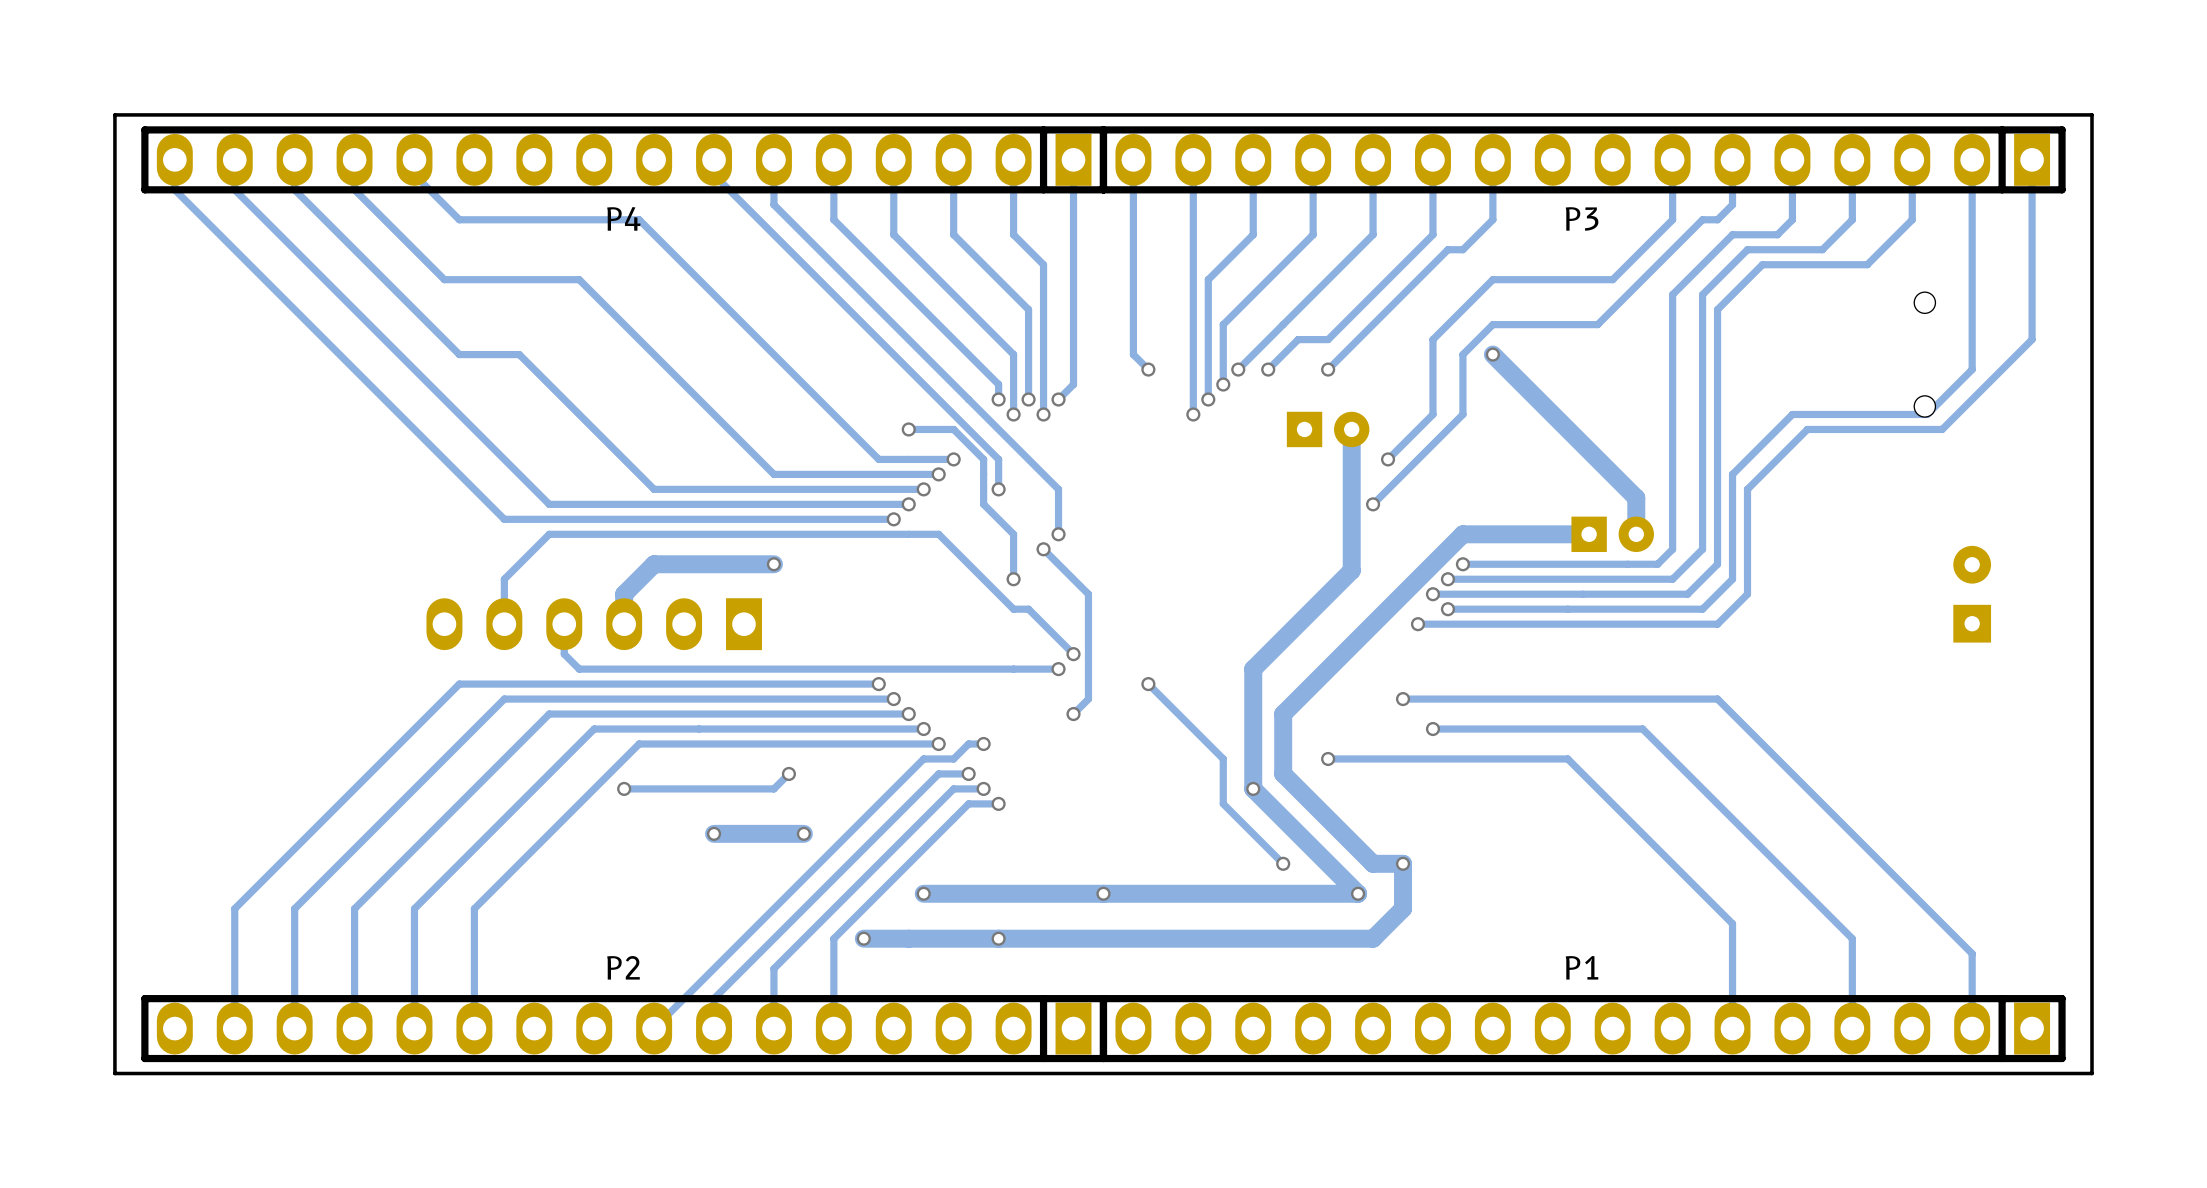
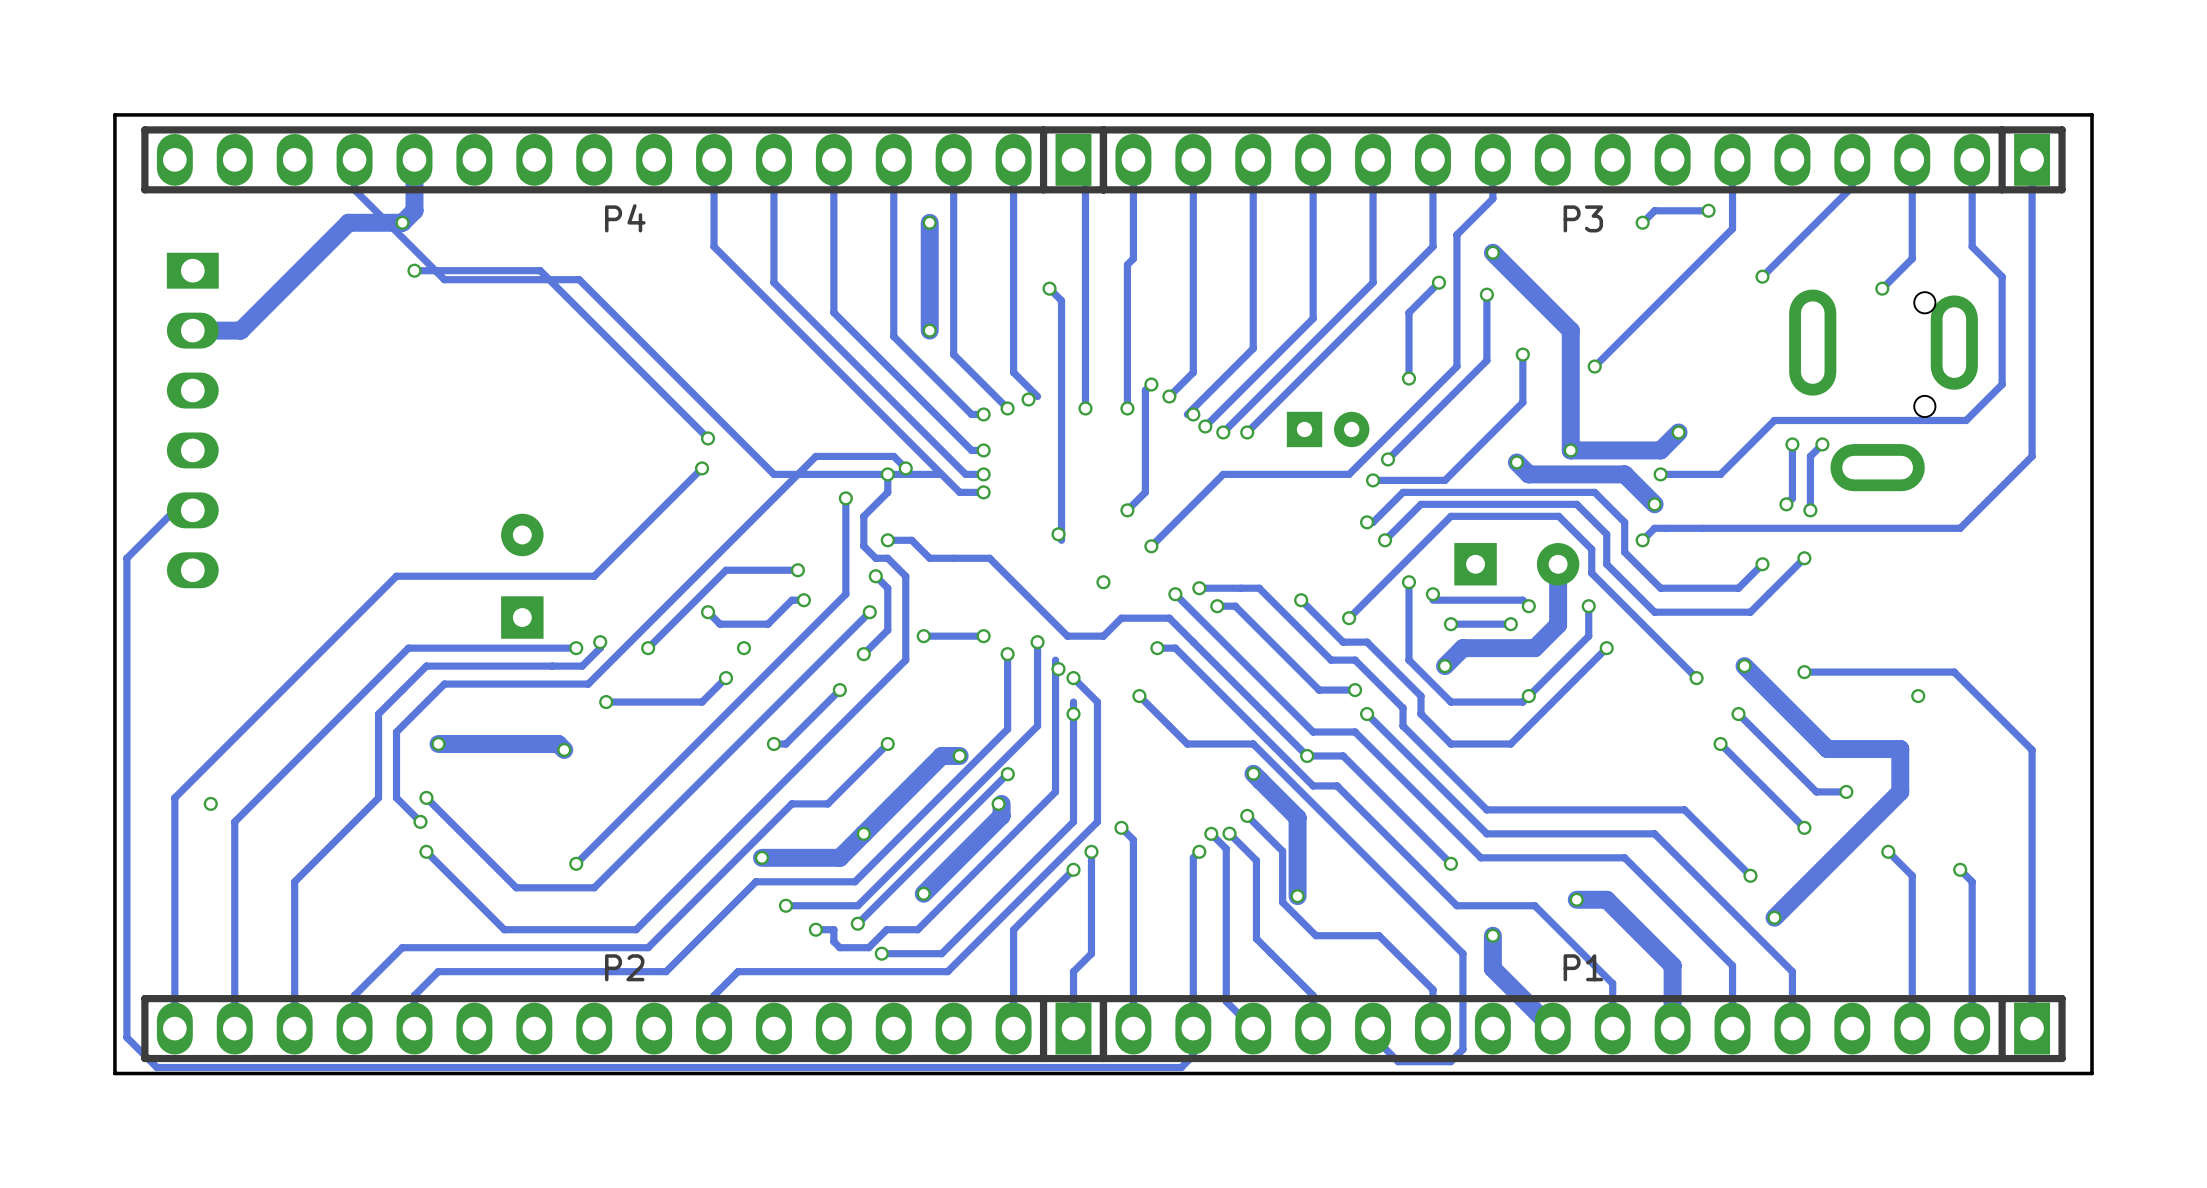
track: (174, 159) (174, 189) (504, 519) (893, 519) -> none
track: (234, 159) (234, 189) (549, 504) (908, 504) -> none
track: (294, 159) (294, 189) (459, 354) (519, 354) (654, 489) (923, 489) -> none
track: (1073, 159) (1073, 384) (1058, 399) -> (1073, 159) (1085, 171) (1085, 408)
track: (1672, 159) (1672, 219) (1612, 279) (1492, 279) (1432, 339) (1432, 414) -> (1486, 294) (1486, 360) (1432, 414)
track: (1792, 159) (1792, 219) (1777, 234) (1732, 234) (1672, 294) (1672, 549) (1657, 564) (1462, 564) -> none
track: (414, 174) (459, 219) (639, 219) (878, 459) (953, 459) -> (414, 174) (414, 210) (402, 222) (348, 222) (240, 330) (192, 330)
track: (714, 174) (998, 459) (998, 489) -> (714, 174) (714, 246) (959, 492) (983, 492)
track: (1852, 186) (1852, 219) (1822, 249) (1747, 249) (1702, 294) (1702, 549) (1672, 579) (1447, 579) -> (1852, 186) (1762, 276)
track: (1492, 198) (1492, 219) (1462, 249) (1447, 249) (1328, 369) -> (1492, 198) (1456, 234) (1456, 366) (1349, 474) (1223, 474) (1151, 546)
track: (773, 204) (1058, 489) (1058, 534) -> (773, 204) (773, 282) (965, 474) (983, 474)
track: (1732, 204) (1717, 219) (1702, 219) (1597, 324) (1492, 324) (1462, 354) (1462, 414) (1373, 504) -> (1732, 204) (1732, 228) (1594, 366)
track: none -> (1708, 210) (1654, 210) (1642, 222)
via: none -> (1708, 210)
track: (833, 219) (998, 384) (998, 399) -> (833, 219) (833, 312) (971, 450) (983, 450)
track: (1912, 219) (1867, 264) (1762, 264) (1717, 309) (1717, 564) (1687, 594) (1432, 594) -> (1912, 219) (1912, 258) (1882, 288)
via: none -> (402, 222)
track: none -> (929, 222) (929, 330)
via: none -> (929, 222)
via: none -> (1642, 222)
track: (893, 234) (1013, 354) -> (893, 234) (893, 336) (971, 414) (983, 414)
track: (953, 234) (1028, 309) (1028, 399) -> (953, 234) (953, 354) (1007, 408)
track: (1013, 234) (1043, 264) (1043, 414) -> (1013, 234) (1013, 354)
track: (1253, 234) (1208, 279) (1208, 399) -> (1253, 234) (1253, 348) (1187, 414)
track: (1313, 234) (1223, 324) (1223, 384) -> (1313, 234) (1313, 318) (1205, 426)
track: (1373, 234) (1238, 369) -> (1373, 234) (1373, 282) (1223, 432)
track: (1432, 234) (1328, 339) (1298, 339) (1268, 369) -> (1432, 234) (1432, 246) (1247, 432)
track: (1972, 246) (1972, 369) (1927, 414) (1792, 414) (1732, 474) (1732, 579) (1702, 609) (1447, 609) -> (1972, 246) (2002, 276) (2002, 384) (1966, 420) (1774, 420) (1720, 474) (1660, 474)
track: none -> (1492, 252) (1570, 330) (1570, 450) (1660, 450) (1678, 432)
via: none -> (1492, 252)
track: (1133, 258) (1133, 354) (1148, 369) -> (1133, 258) (1127, 264) (1127, 408)
track: none -> (414, 270) (540, 270) (708, 438)
via: none -> (414, 270)
via: none -> (1762, 276)
track: none -> (1438, 282) (1409, 312) (1409, 378)
via: none -> (1438, 282)
track: none -> (1049, 288) (1061, 300) (1061, 540)
via: none -> (1049, 288)
via: none -> (1882, 288)
via: none -> (1486, 294)
via: none -> (929, 330)
track: (2032, 339) (1942, 429) (1807, 429) (1747, 489) (1747, 594) (1717, 624) (1510, 624) -> (2032, 339) (2032, 456) (1960, 528) (1654, 528) (1642, 540)
track: (1492, 354) (1636, 497) (1636, 534) -> none
via: (1492, 354) -> none
track: none -> (1522, 354) (1522, 402) (1444, 480) (1373, 480)
via: none -> (1522, 354)
via: none -> (1594, 366)
via position: (1148, 369) -> (1151, 384)
via: (1238, 369) -> none
via: (1268, 369) -> none
via: (1328, 369) -> none
track: (1013, 372) (1013, 414) -> (1013, 372) (1037, 396)
track: (1193, 372) (1193, 414) -> (1193, 372) (1169, 396)
via: none -> (1409, 378)
track: none -> (1151, 384) (1145, 390) (1145, 492) (1127, 510)
via: (1223, 384) -> none
part: none -> (1883, 390)
via: none -> (1169, 396)
via: (998, 399) -> none
via: (1058, 399) -> none
via: (1208, 399) -> none
via: none -> (1007, 408)
via: none -> (1085, 408)
via: none -> (1127, 408)
via: none -> (983, 414)
via: (1013, 414) -> none
via: (1043, 414) -> none
via: none -> (1205, 426)
track: (908, 429) (953, 429) (983, 459) (983, 504) (1013, 534) (1013, 579) -> none
via: (908, 429) -> none
track: (1351, 429) (1351, 570) (1253, 669) (1253, 788) (1358, 893) (923, 893) -> (1001, 803) (1001, 815) (923, 893)
via: none -> (1223, 432)
via: none -> (1247, 432)
via: none -> (1678, 432)
via: none -> (708, 438)
track: none -> (1792, 444) (1792, 498) (1786, 504)
via: none -> (1792, 444)
track: none -> (1822, 444) (1810, 456) (1810, 510)
via: none -> (1822, 444)
via: none -> (983, 450)
via: none -> (1570, 450)
via: (953, 459) -> none
track: none -> (1516, 462) (1528, 474) (1624, 474) (1654, 504)
via: none -> (1516, 462)
track: none -> (702, 468) (594, 576) (396, 576) (174, 797) (174, 1028)
via: none -> (702, 468)
via: none -> (905, 468)
track: none -> (887, 474) (887, 492) (863, 516) (863, 546) (875, 558) (887, 558) (905, 576) (905, 660) (636, 929) (504, 929) (426, 851)
via: none -> (887, 474)
via: (938, 474) -> none
via: none -> (983, 474)
via: none -> (1660, 474)
via: none -> (1373, 480)
via: (923, 489) -> none
via: (998, 489) -> none
via: none -> (983, 492)
track: none -> (845, 498) (845, 594) (576, 863)
via: none -> (845, 498)
via: (908, 504) -> none
via: (1373, 504) -> none
via: none -> (1654, 504)
via: none -> (1786, 504)
track: none -> (192, 510) (174, 510) (126, 558) (126, 1037) (156, 1067) (1181, 1067) (1193, 1055) (1193, 857) (1199, 851)
via: none -> (1127, 510)
via: none -> (1810, 510)
via: (893, 519) -> none
track: none -> (1367, 522) (1373, 522) (1403, 492) (1594, 492) (1624, 522) (1624, 552) (1660, 588) (1738, 588) (1762, 564)
via: none -> (1367, 522)
track: (1589, 534) (1462, 534) (1283, 714) (1283, 773) -> (1139, 696) (1187, 743) (1253, 743) (1283, 773)
part: (1612, 534) -> none
track: none -> (887, 540) (911, 540) (929, 558) (989, 558) (1067, 636) (1103, 636) (1121, 618) (1169, 618) (1307, 755) (1343, 755) (1450, 863)
via: none -> (887, 540)
track: none -> (1385, 540) (1420, 504) (1576, 504) (1606, 534) (1606, 564) (1654, 612) (1750, 612) (1804, 558)
via: none -> (1385, 540)
via: none -> (1642, 540)
via: none -> (1151, 546)
track: (1043, 549) (1088, 594) (1088, 699) (1073, 714) -> none
via: (1043, 549) -> none
via: none -> (1804, 558)
track: (773, 564) (654, 564) (624, 594) (624, 624) -> none
via: (773, 564) -> none
via: (1462, 564) -> none
part: none -> (1516, 564)
track: none -> (1558, 564) (1558, 624) (1534, 648) (1462, 648) (1444, 666)
via: none -> (1762, 564)
track: none -> (797, 570) (726, 570) (648, 648)
via: none -> (797, 570)
part: none -> (522, 576)
track: none -> (875, 576) (887, 588) (887, 630) (863, 654)
via: none -> (875, 576)
via: (1013, 579) -> none
via: (1447, 579) -> none
via: none -> (1103, 582)
track: none -> (1409, 582) (1409, 660) (1450, 702) (1522, 702) (1588, 636) (1588, 606)
via: none -> (1409, 582)
track: none -> (1199, 588) (1259, 588) (1331, 660) (1355, 660) (1403, 708) (1403, 726) (1486, 809) (1684, 809) (1750, 875)
via: none -> (1199, 588)
via: none -> (1175, 594)
part: (1972, 594) -> none
track: none -> (803, 600) (791, 600) (767, 624) (720, 624) (708, 612)
via: none -> (803, 600)
track: none -> (1301, 600) (1343, 642) (1367, 642) (1420, 696) (1420, 714) (1450, 743) (1510, 743) (1606, 648)
via: none -> (1301, 600)
track: none -> (1432, 600) (1522, 600) (1528, 606)
track: none -> (1217, 606) (1235, 606) (1319, 690) (1355, 690)
via: none -> (1217, 606)
via: none -> (1528, 606)
via: none -> (1588, 606)
via position: (1447, 609) -> (1450, 624)
via: none -> (708, 612)
track: none -> (869, 612) (594, 887) (516, 887) (426, 797)
via: none -> (869, 612)
track: none -> (1349, 618) (1450, 516) (1558, 516) (1591, 549) (1591, 573) (1696, 678)
via: none -> (1349, 618)
track: (504, 624) (504, 579) (549, 534) (938, 534) (1013, 609) (1028, 609) (1073, 654) -> none
track: (564, 624) (564, 654) (579, 669) (1058, 669) -> none
part rotation: 0° (594, 624) -> 90° counterclockwise (192, 420)
part position: (594, 624) -> (192, 420)
via: (1417, 624) -> none
track: (1450, 624) (1417, 624) -> none
via: none -> (1510, 624)
via: none -> (923, 636)
track: none -> (983, 636) (923, 636)
via: none -> (983, 636)
via: none -> (600, 642)
track: none -> (1037, 642) (1037, 726) (857, 905) (785, 905)
via: none -> (1037, 642)
via: none -> (576, 648)
via: none -> (648, 648)
via: none -> (743, 648)
track: none -> (1157, 648) (1175, 648) (1313, 785) (1337, 785) (1456, 905) (1534, 905) (1612, 983) (1612, 1028)
via: none -> (1157, 648)
via: none -> (1606, 648)
via: none -> (863, 654)
via: none -> (1007, 654)
via: (1073, 654) -> none
via: none -> (1444, 666)
track: none -> (1744, 666) (1827, 749) (1900, 749) (1900, 791) (1774, 917)
via: none -> (1744, 666)
track: none -> (1804, 672) (1954, 672) (2032, 749) (2032, 1028)
via: none -> (1804, 672)
track: none -> (726, 678) (702, 702) (606, 702)
via: none -> (726, 678)
via: none -> (1073, 678)
via: none -> (1696, 678)
track: (459, 684) (234, 908) -> (576, 648) (408, 648) (234, 821) (234, 908)
track: none -> (459, 684) (444, 684) (396, 732) (396, 797) (420, 821)
track: (878, 684) (588, 684) -> (905, 468) (893, 456) (815, 456) (588, 684)
via: (878, 684) -> none
track: (1148, 684) (1223, 758) (1223, 803) (1283, 863) -> none
via position: (1148, 684) -> (1139, 696)
via: none -> (839, 690)
via: none -> (1355, 690)
via: none -> (1528, 696)
via: none -> (1918, 696)
track: (893, 699) (504, 699) (294, 908) -> (600, 642) (600, 648) (582, 666) (426, 666) (378, 714) (378, 797) (294, 881) (294, 908)
via: (893, 699) -> none
track: (1403, 699) (1717, 699) (1972, 953) -> (1960, 869) (1972, 881) (1972, 953)
via: (1403, 699) -> none
via: none -> (606, 702)
track: none -> (1073, 702) (1073, 821) (941, 953) (881, 953)
track: (908, 714) (549, 714) (354, 908) (354, 995) -> (887, 743) (827, 803) (791, 803) (648, 947) (402, 947) (354, 995)
via: (908, 714) -> none
track: none -> (1367, 714) (1486, 833) (1654, 833) (1792, 971) (1792, 1028)
via: none -> (1367, 714)
track: none -> (1738, 714) (1816, 791) (1846, 791)
via: none -> (1738, 714)
track: (923, 729) (594, 729) (414, 908) (414, 995) -> (1007, 654) (1007, 729) (854, 881) (755, 881) (666, 971) (438, 971) (414, 995)
via: (923, 729) -> none
track: (1432, 729) (1642, 729) (1852, 938) (1852, 1028) -> none
via: (1432, 729) -> none
track: none -> (438, 743) (558, 743) (564, 749)
via: none -> (438, 743)
track: (773, 743) (639, 743) (474, 908) (474, 1028) -> none
via: none -> (887, 743)
track: (938, 743) (785, 743) -> (839, 690) (785, 743)
via: (938, 743) -> none
track: (983, 743) (968, 743) (953, 758) (923, 758) (654, 1028) -> none
via: (983, 743) -> none
track: none -> (1720, 743) (1804, 827)
via: none -> (1720, 743)
via: none -> (564, 749)
track: none -> (959, 755) (941, 755) (839, 857) (761, 857)
via: none -> (959, 755)
track: (1328, 758) (1567, 758) (1732, 923) (1732, 965) -> (1175, 594) (1313, 732) (1355, 732) (1480, 857) (1624, 857) (1732, 965)
via position: (1328, 758) -> (1307, 755)
track: (788, 773) (773, 788) (624, 788) -> none
via position: (788, 773) -> (773, 743)
track: (968, 773) (938, 773) (714, 998) -> (1073, 678) (1097, 702) (1097, 821) (947, 971) (738, 971) (714, 995) (714, 998)
via: (968, 773) -> none
track: none -> (1253, 773) (1297, 817) (1297, 896)
via: none -> (1253, 773)
track width: thick (1283, 773) (1373, 863) -> thin (1283, 773) (1373, 863)
track: none -> (1007, 774) (857, 923)
via: none -> (1007, 774)
via: (624, 788) -> none
track: (983, 788) (953, 788) (773, 968) (773, 1028) -> none
via: (983, 788) -> none
via: (1253, 788) -> none
via: none -> (1846, 791)
via: none -> (426, 797)
via: none -> (210, 803)
track: (998, 803) (968, 803) (833, 938) -> (815, 929) (833, 929) (833, 938)
track: none -> (1247, 815) (1282, 851) (1282, 902) (1315, 935) (1379, 935) (1432, 989) (1432, 1028)
via: none -> (1247, 815)
via: none -> (420, 821)
track: none -> (1121, 827) (1133, 839) (1133, 1028)
via: none -> (1121, 827)
via: none -> (1804, 827)
via: (714, 833) -> none
track: (803, 833) (714, 833) -> none
via: (803, 833) -> none
via: none -> (863, 833)
track: none -> (1211, 833) (1226, 848) (1226, 1001) (1253, 1028)
via: none -> (1211, 833)
track: none -> (1229, 833) (1256, 860) (1256, 938) (1313, 995) (1313, 1028)
via: none -> (1229, 833)
via: none -> (426, 851)
track: none -> (1091, 851) (1091, 953) (1073, 971) (1073, 1028)
via: none -> (1091, 851)
via: none -> (1199, 851)
track: none -> (1888, 851) (1912, 875) (1912, 1028)
via: none -> (1888, 851)
via: none -> (761, 857)
via: none -> (576, 863)
via: (1283, 863) -> none
track: (1373, 863) (1403, 863) (1403, 908) (1373, 938) (863, 938) -> (1373, 863) (1462, 953) (1462, 1049) (1450, 1061) (1398, 1061) (1373, 1036) (1373, 1028)
via position: (1403, 863) -> (1450, 863)
track: none -> (1073, 869) (1013, 929) (1013, 1028)
via: none -> (1073, 869)
via: none -> (1960, 869)
via: none -> (1750, 875)
via: (1103, 893) -> none
via: (1358, 893) -> none
via: none -> (1297, 896)
track: none -> (1576, 899) (1606, 899) (1672, 965) (1672, 1028)
via: none -> (1576, 899)
via: none -> (785, 905)
via: none -> (1774, 917)
via: none -> (857, 923)
via: none -> (815, 929)
track: none -> (1492, 935) (1492, 968) (1552, 1028)
via: none -> (1492, 935)
via: (863, 938) -> none
via: (998, 938) -> none
track: (833, 941) (833, 1028) -> (833, 941) (839, 947) (868, 947) (886, 929) (917, 929) (1055, 791) (1055, 660)
via: none -> (881, 953)

